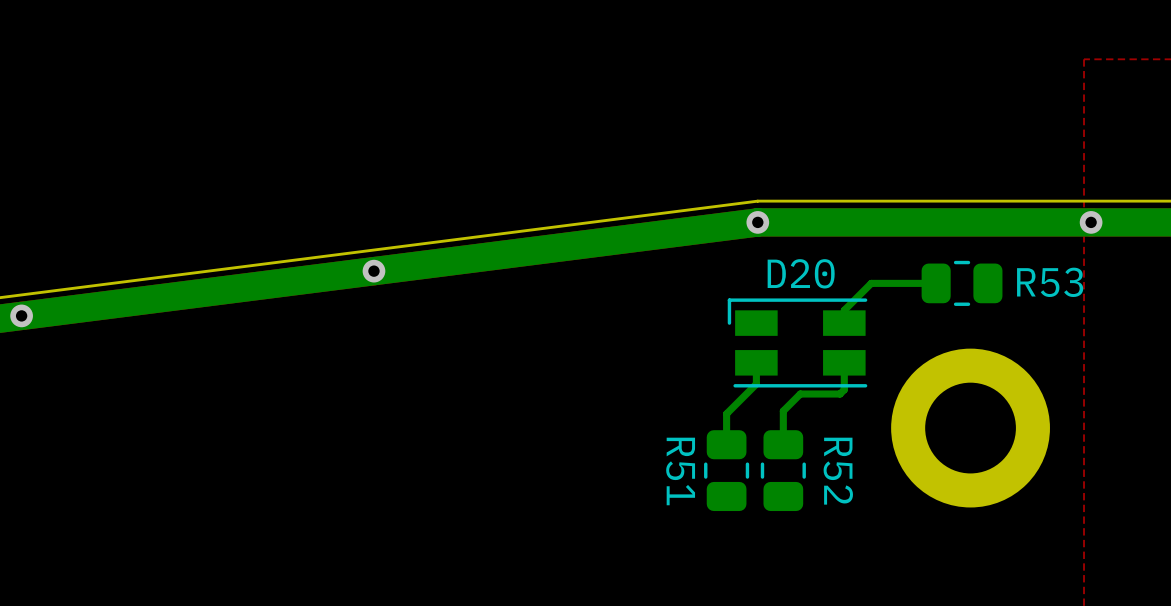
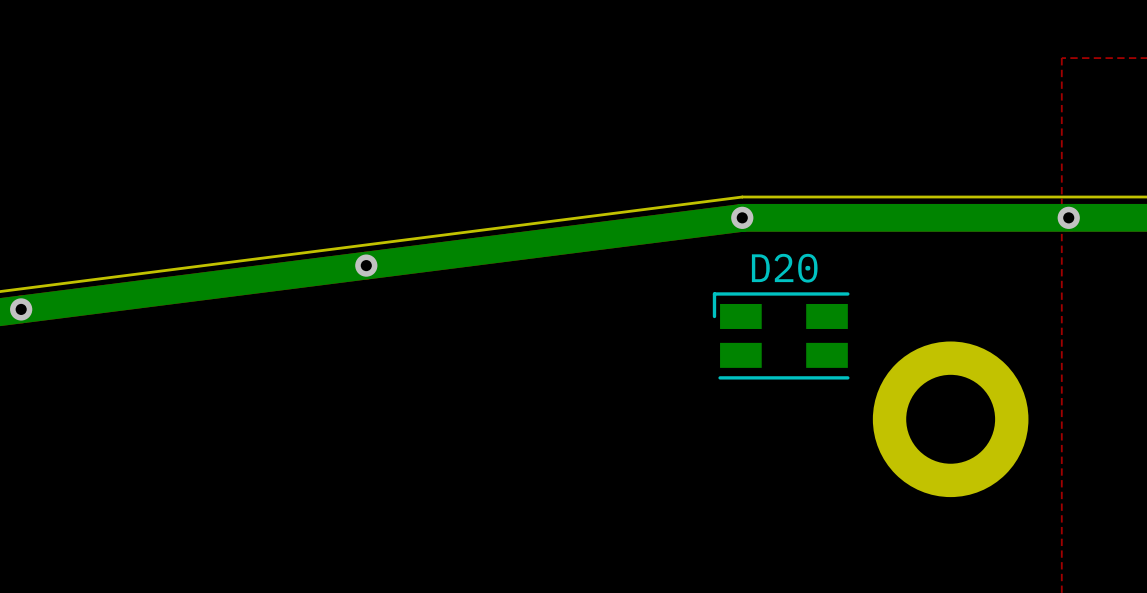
bottom track: (936, 283) (871, 283) (844, 310) (844, 323) -> none
R53: (962, 283) -> none
bottom track: (756, 362) (756, 384) (726, 413) (726, 444) -> none
bottom track: (844, 362) (844, 389) (840, 394) (800, 394) (783, 411) (783, 444) -> none
R51: (726, 470) -> none
R52: (783, 470) -> none

